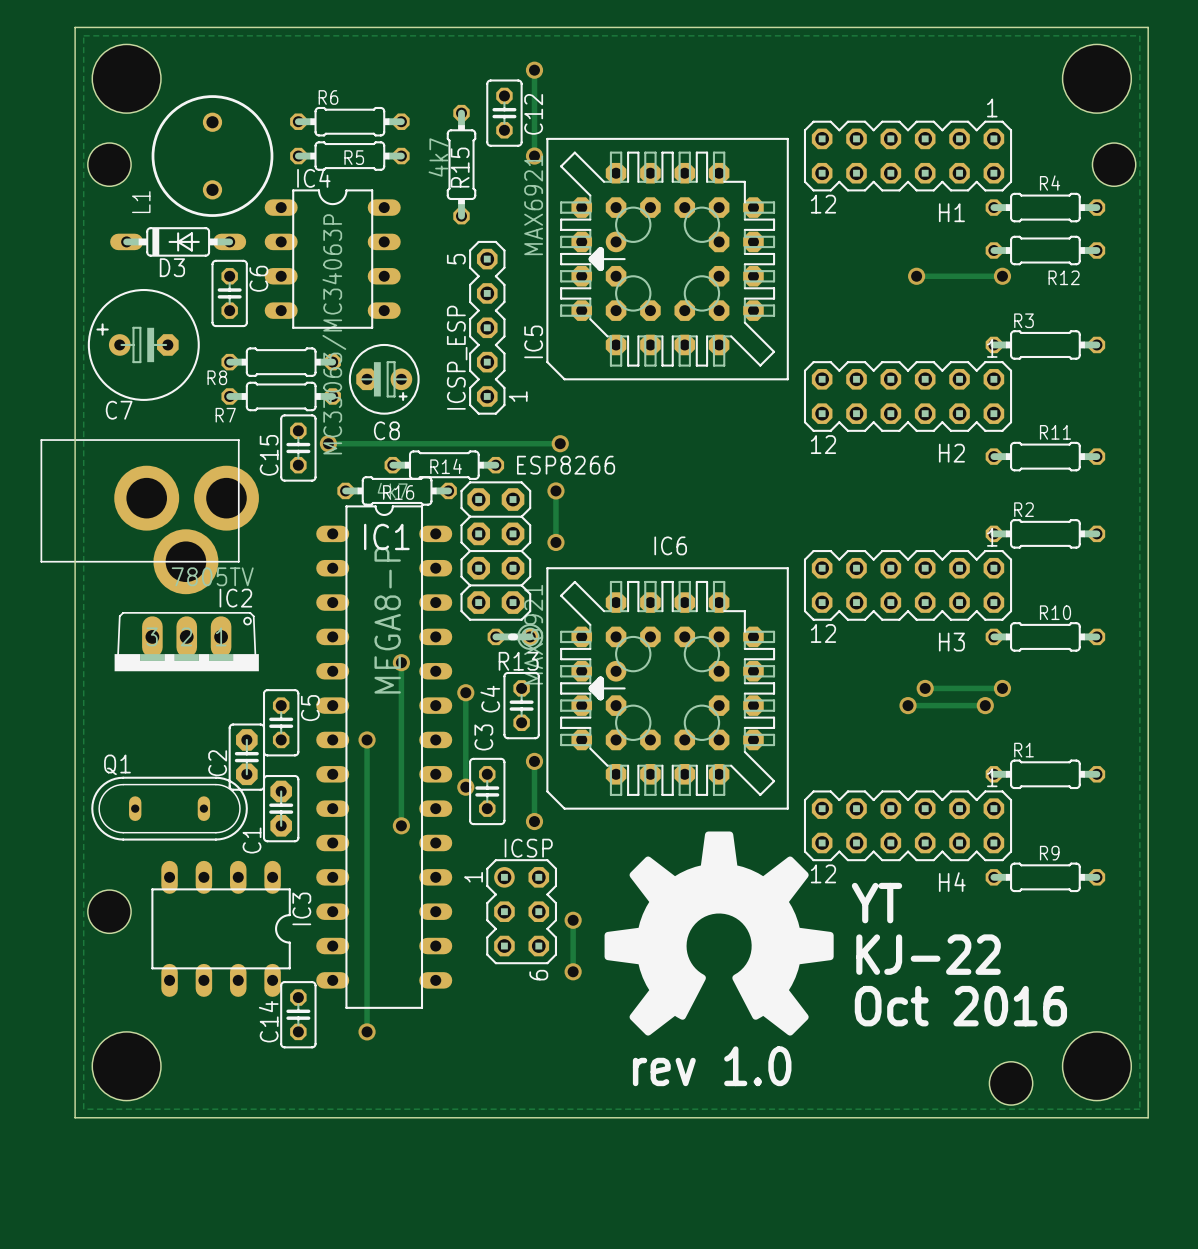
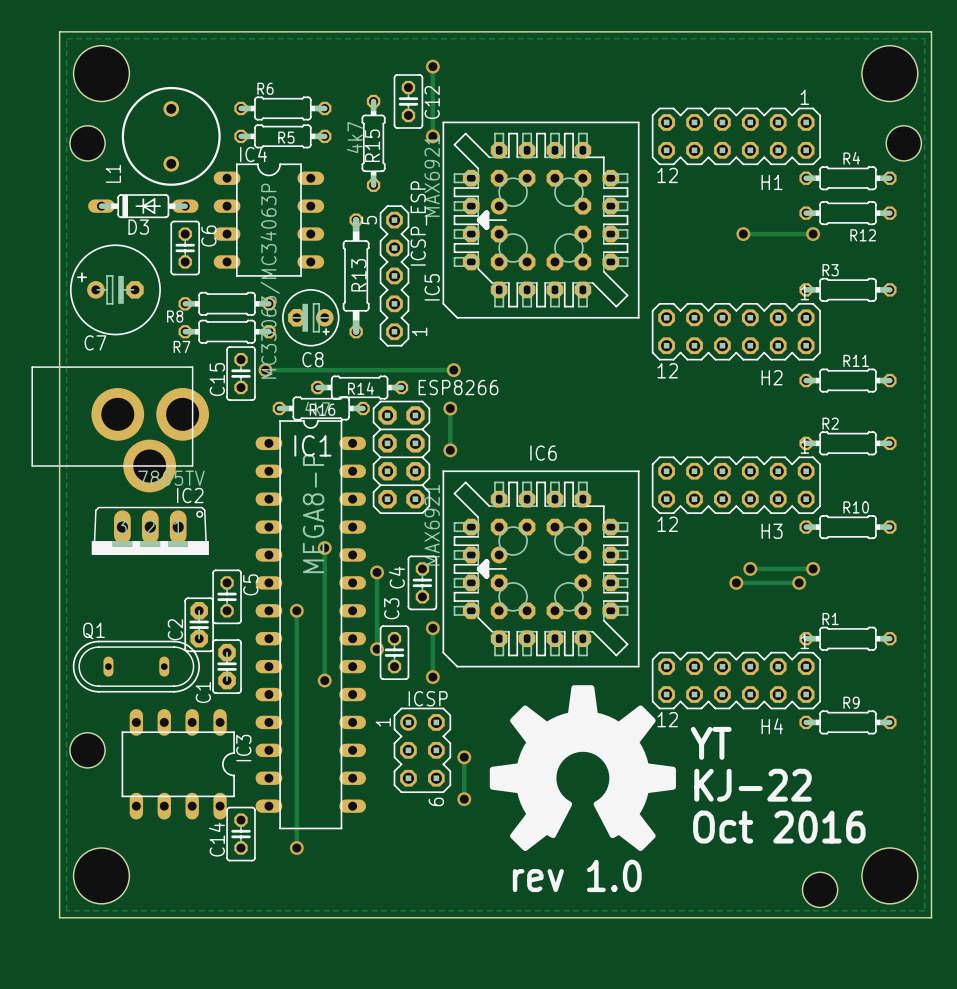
ICSP_ESP name position: ICSP_ESP (457, 357) -> ICSP_ESP (418, 223)
R13 footprint: [487, 623, 544, 650] -> [342, 213, 370, 339]

